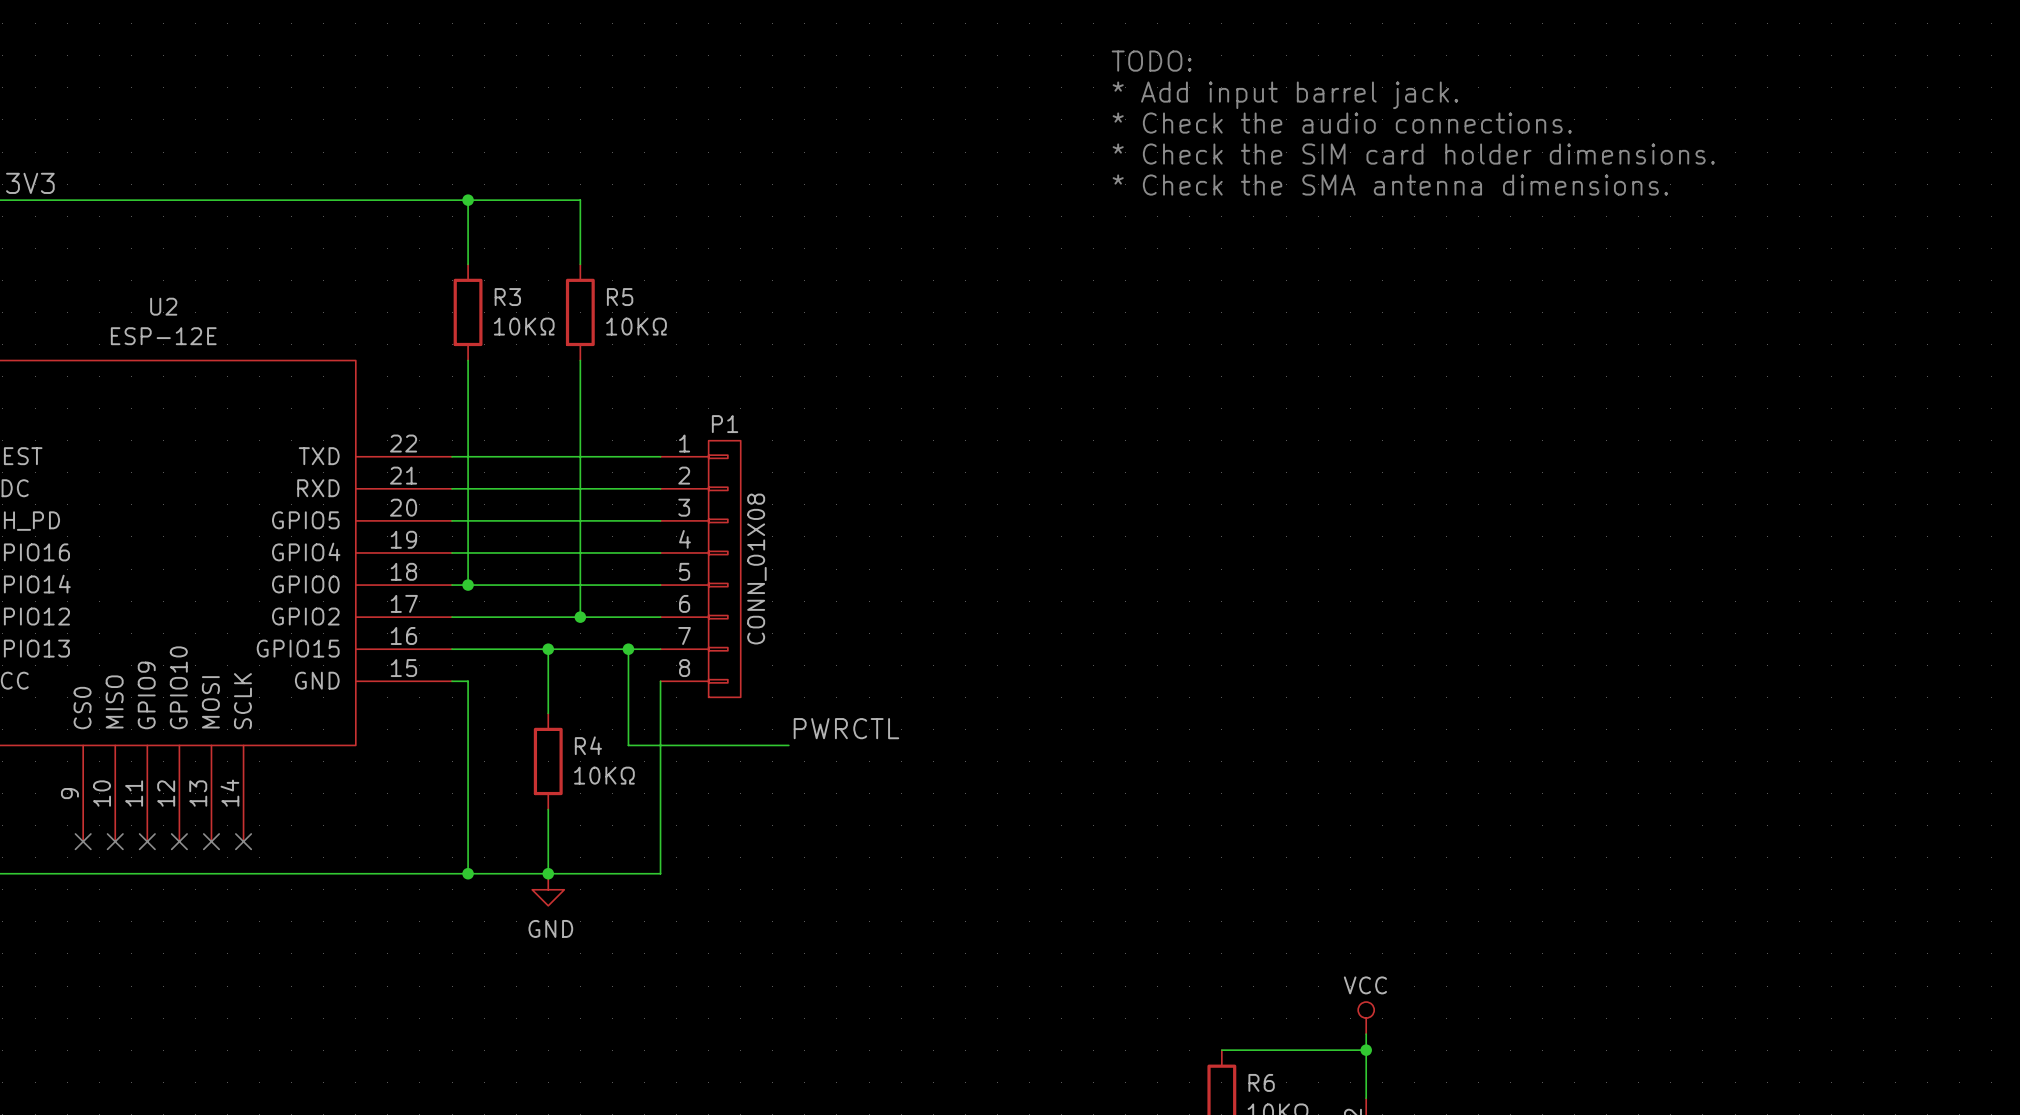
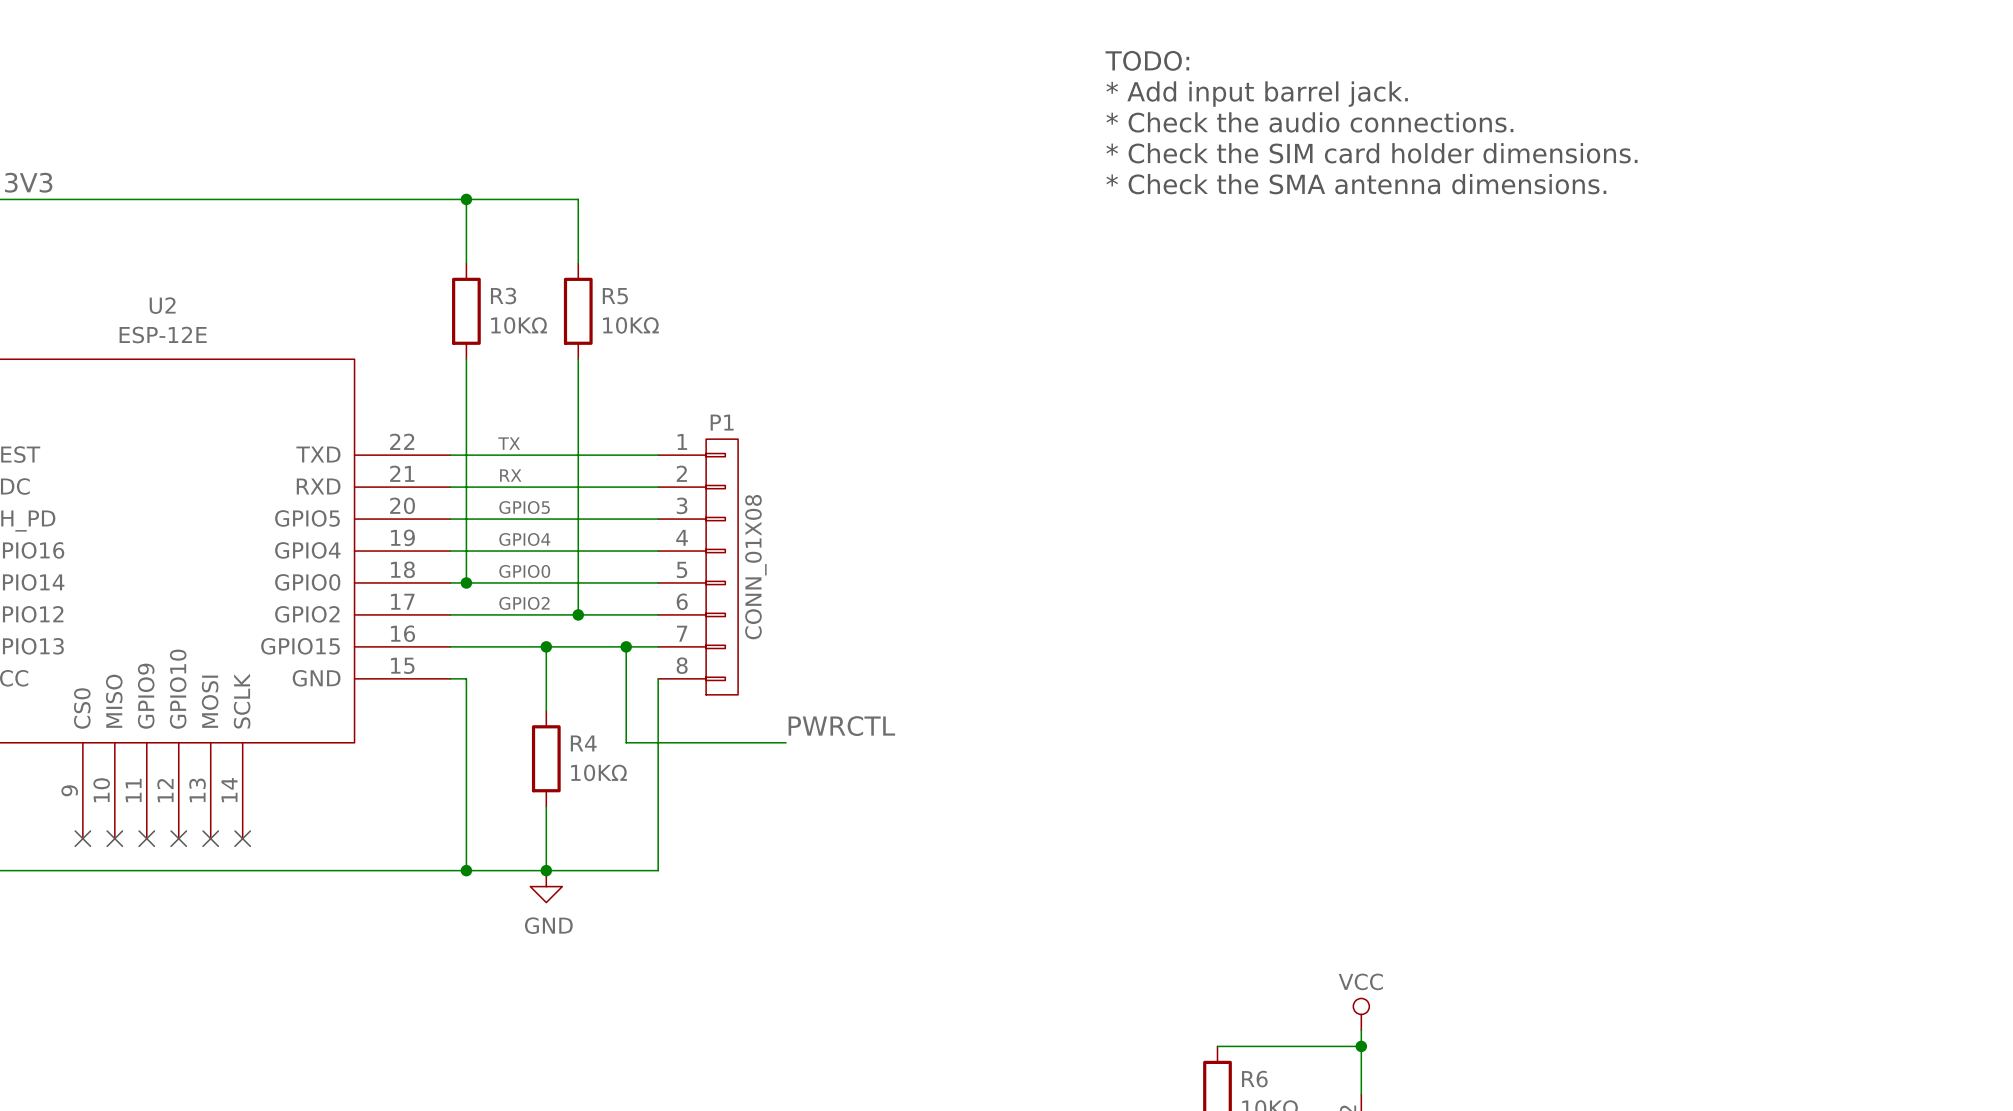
label: none -> TX (509, 443)
label: none -> RX (510, 475)
label: none -> GPIO5 (524, 507)
label: none -> GPIO4 (524, 539)
label: none -> GPIO0 (524, 571)
label: none -> GPIO2 (524, 603)

